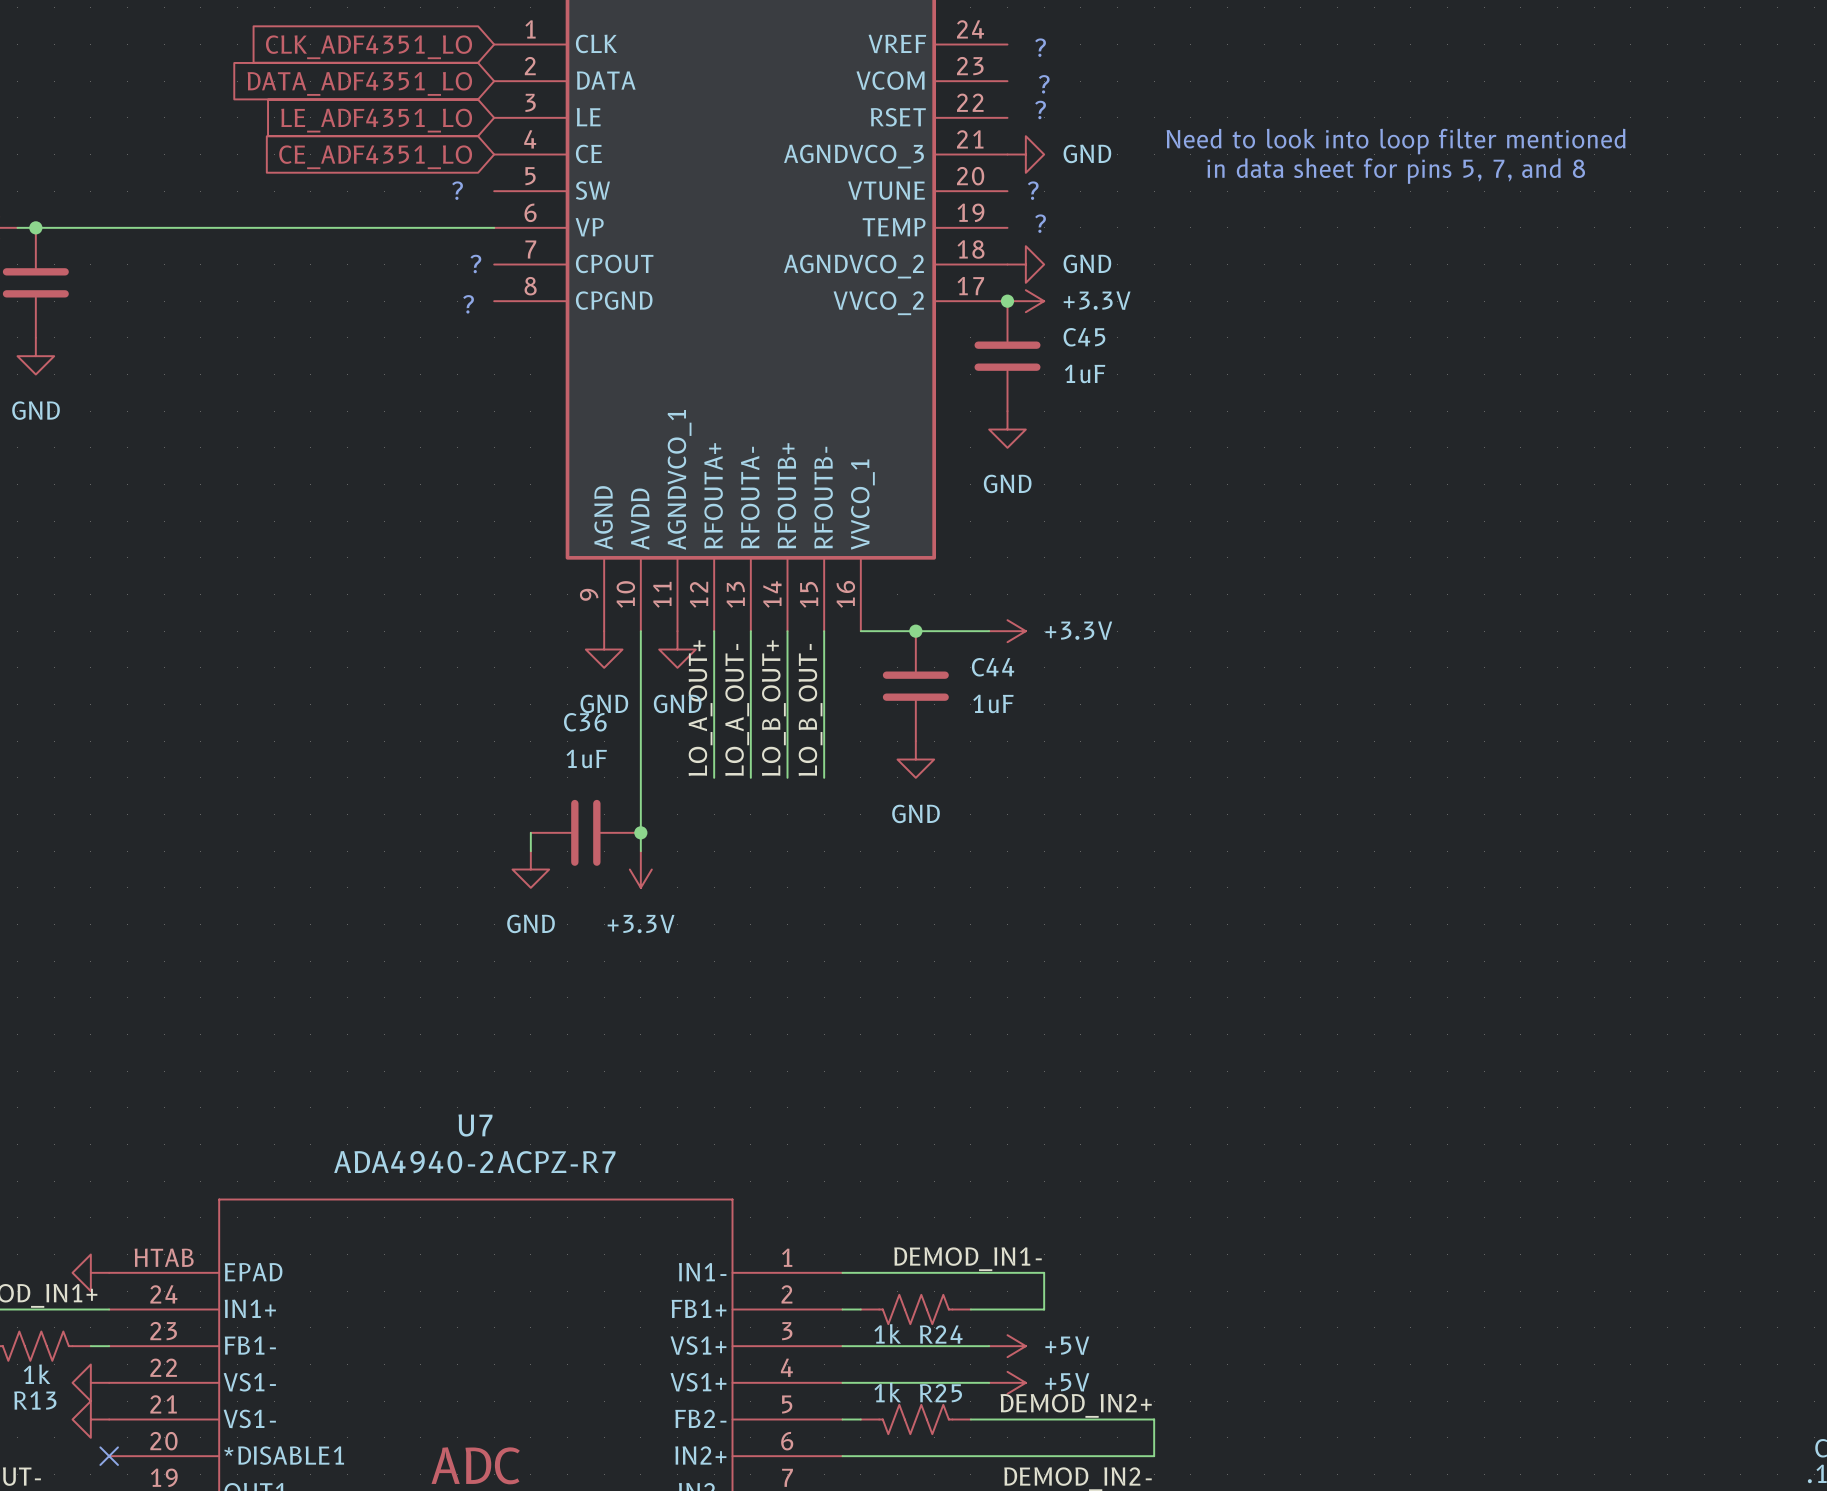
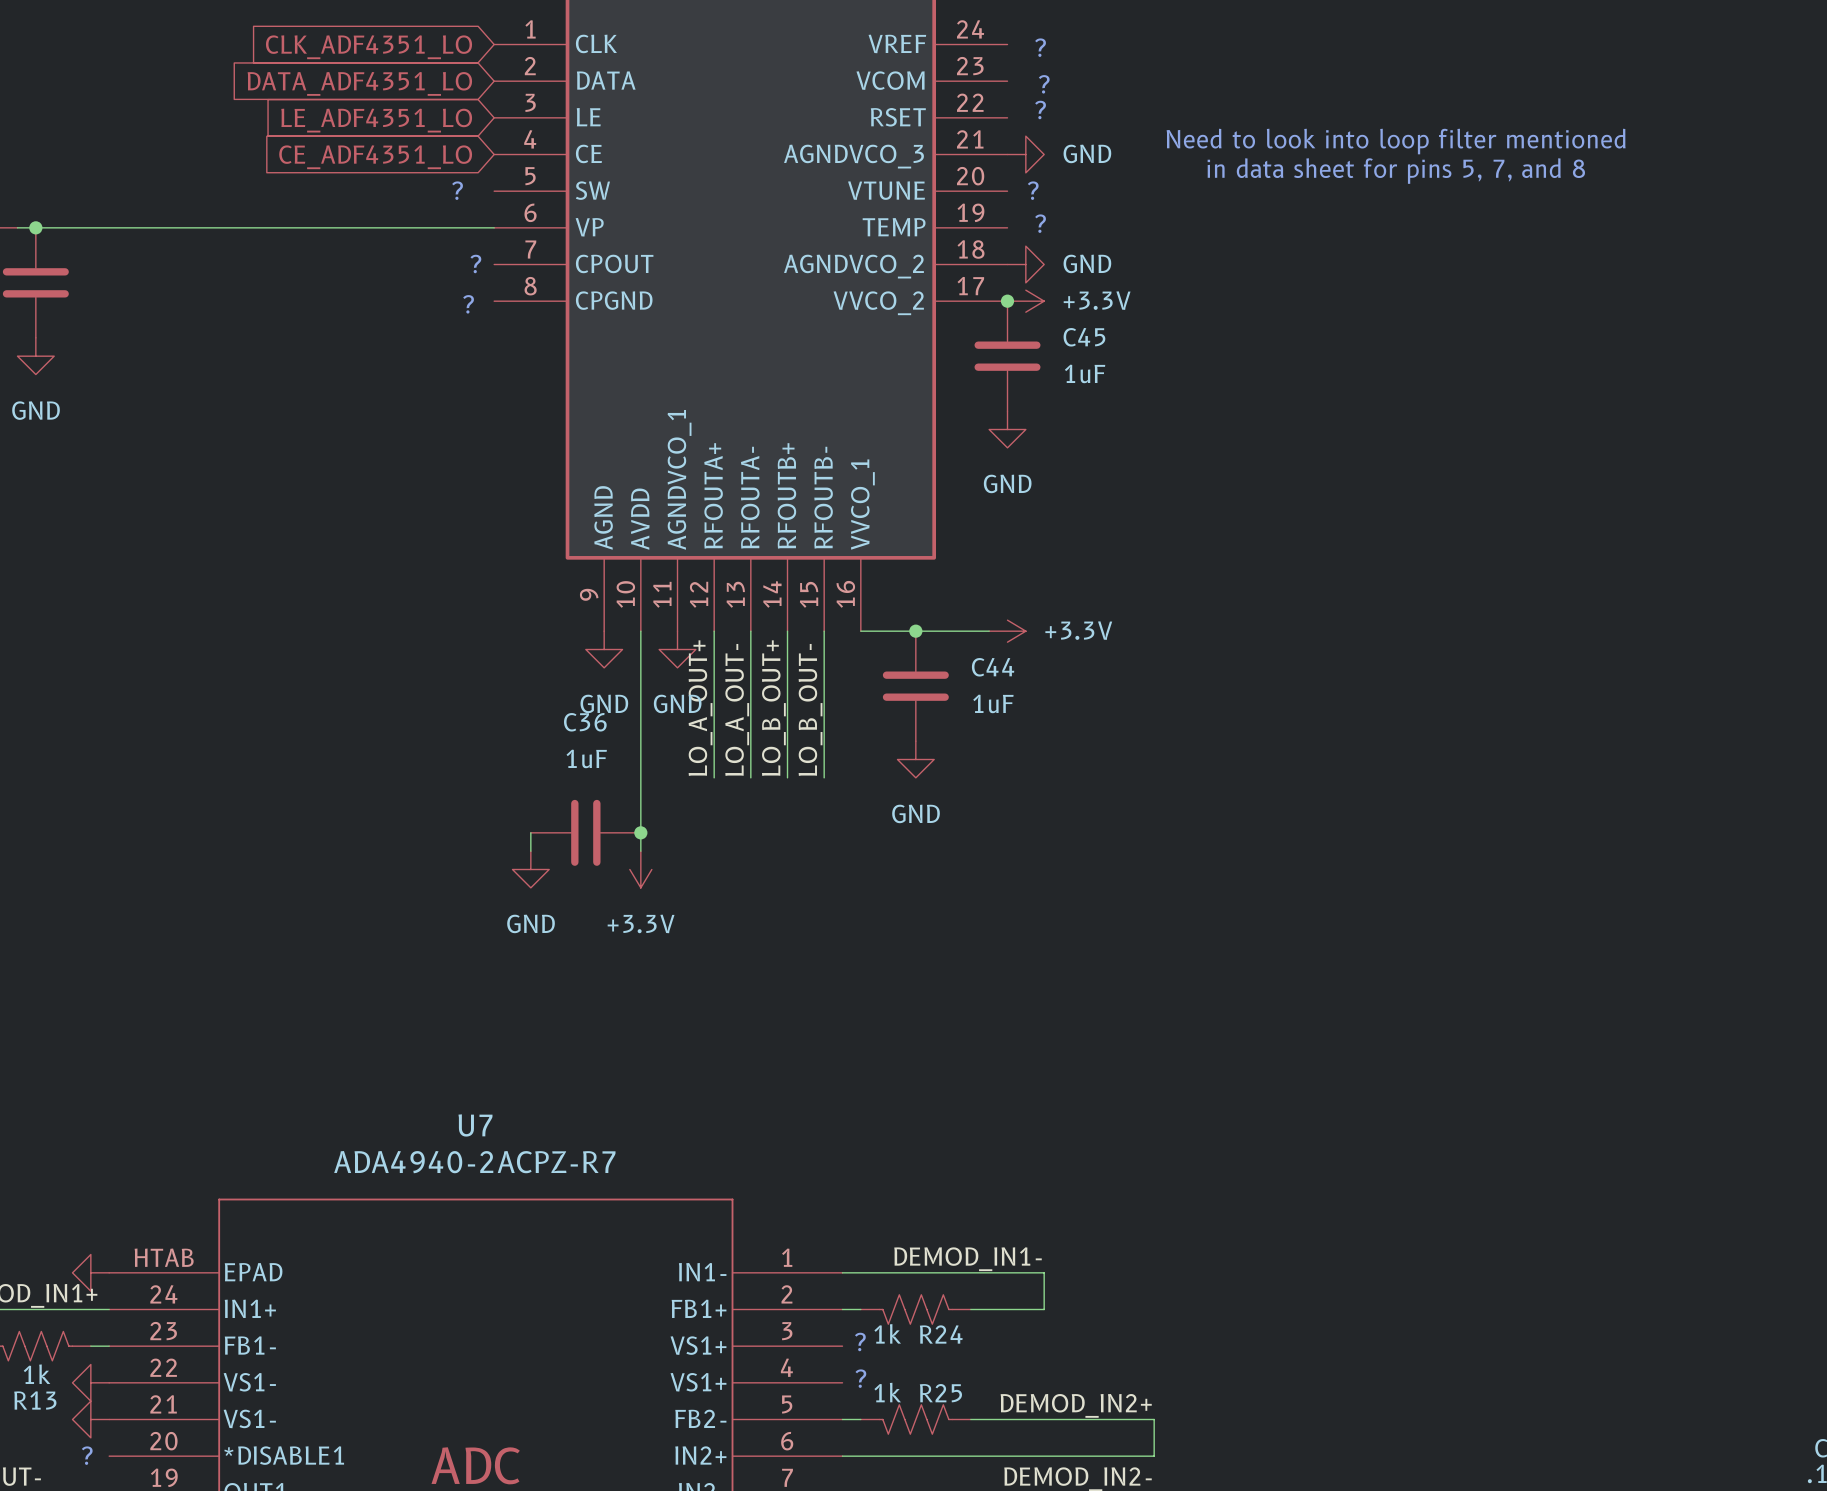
text: none -> ? (860, 1341)
wire: (842, 1346) (989, 1346) -> none
power symbol: +5V (1007, 1346) -> none
text: none -> ? (860, 1378)
wire: (842, 1382) (989, 1382) -> none
power symbol: +5V (1007, 1382) -> none
text: none -> ? (87, 1455)
no-connect mark: (109, 1456) -> none

